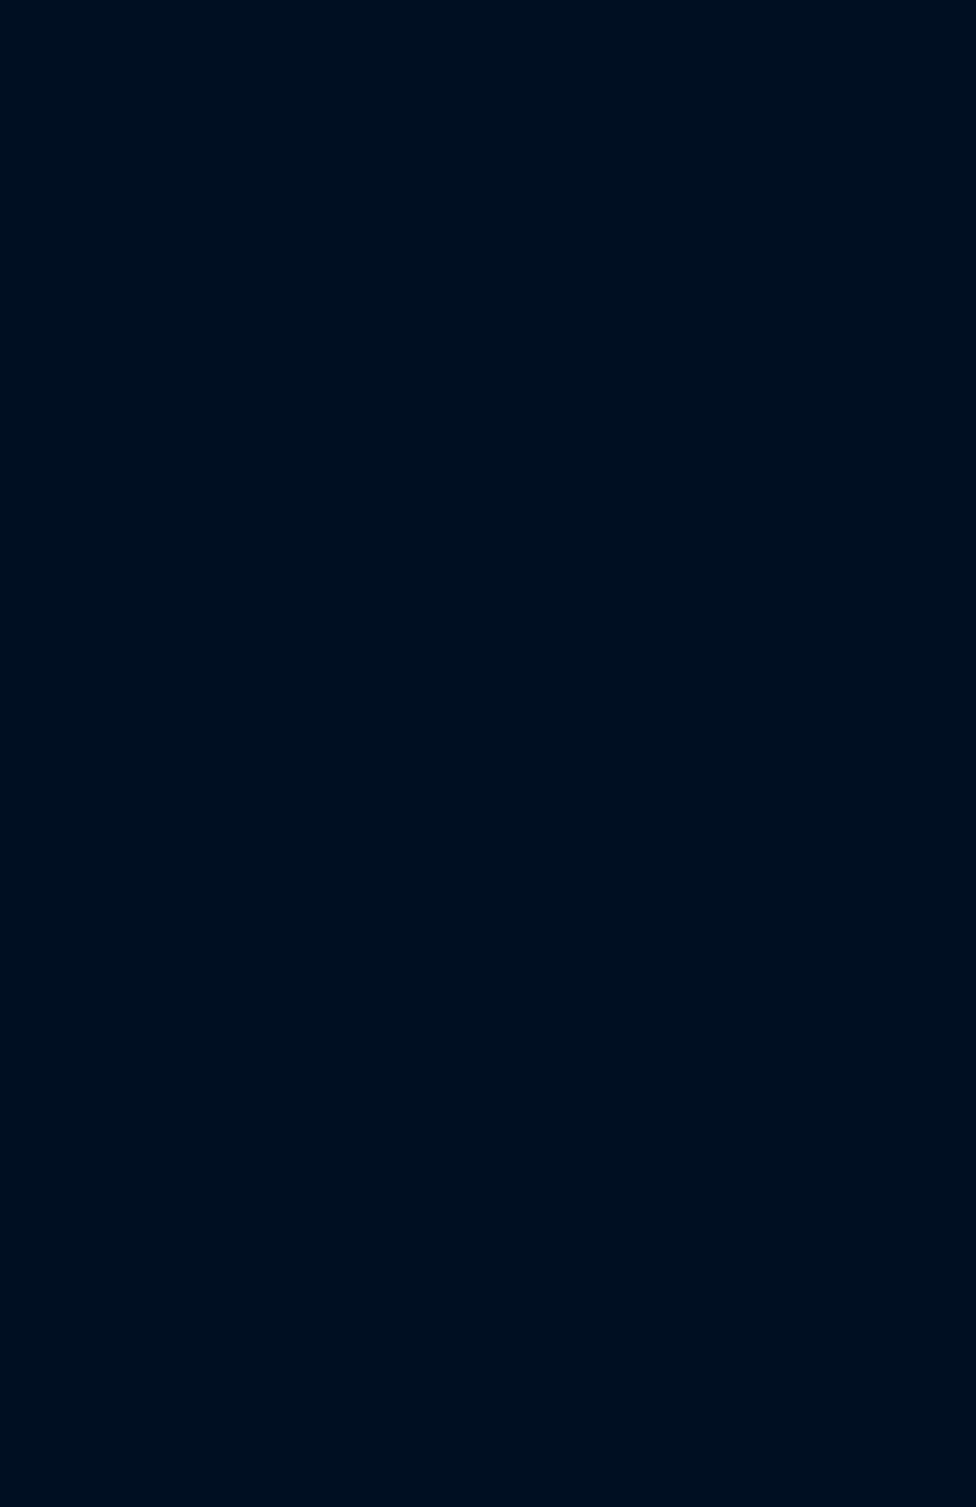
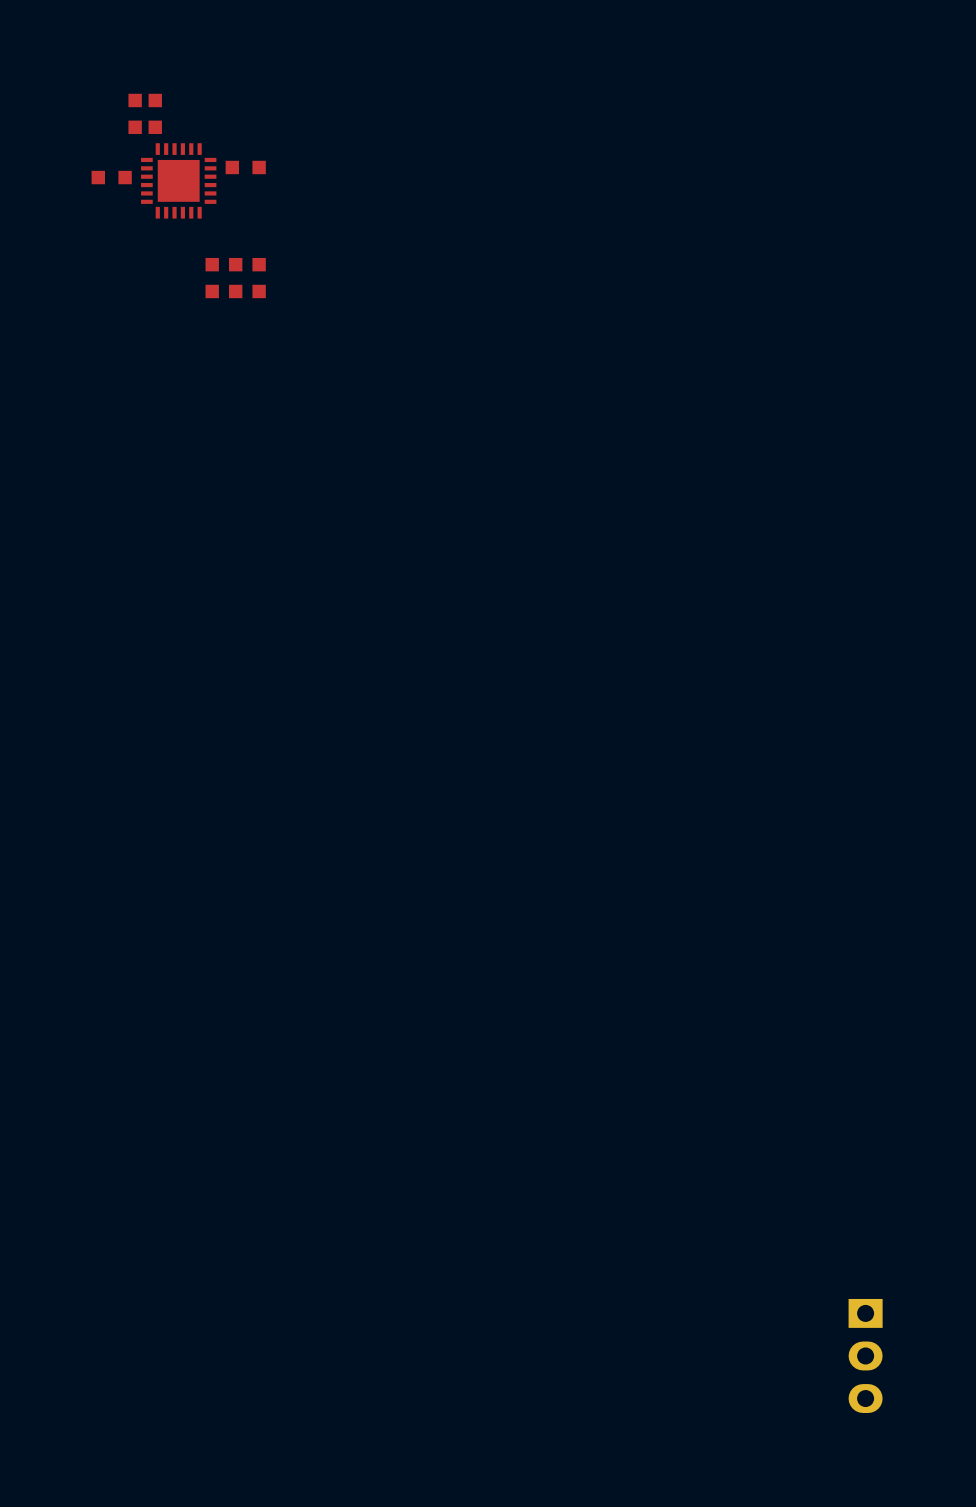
part: none -> (135, 113)
part: none -> (155, 113)
part: none -> (245, 167)
part: none -> (111, 177)
part: none -> (178, 180)
part: none -> (212, 278)
part: none -> (235, 278)
part: none -> (259, 278)
part: none -> (865, 1355)

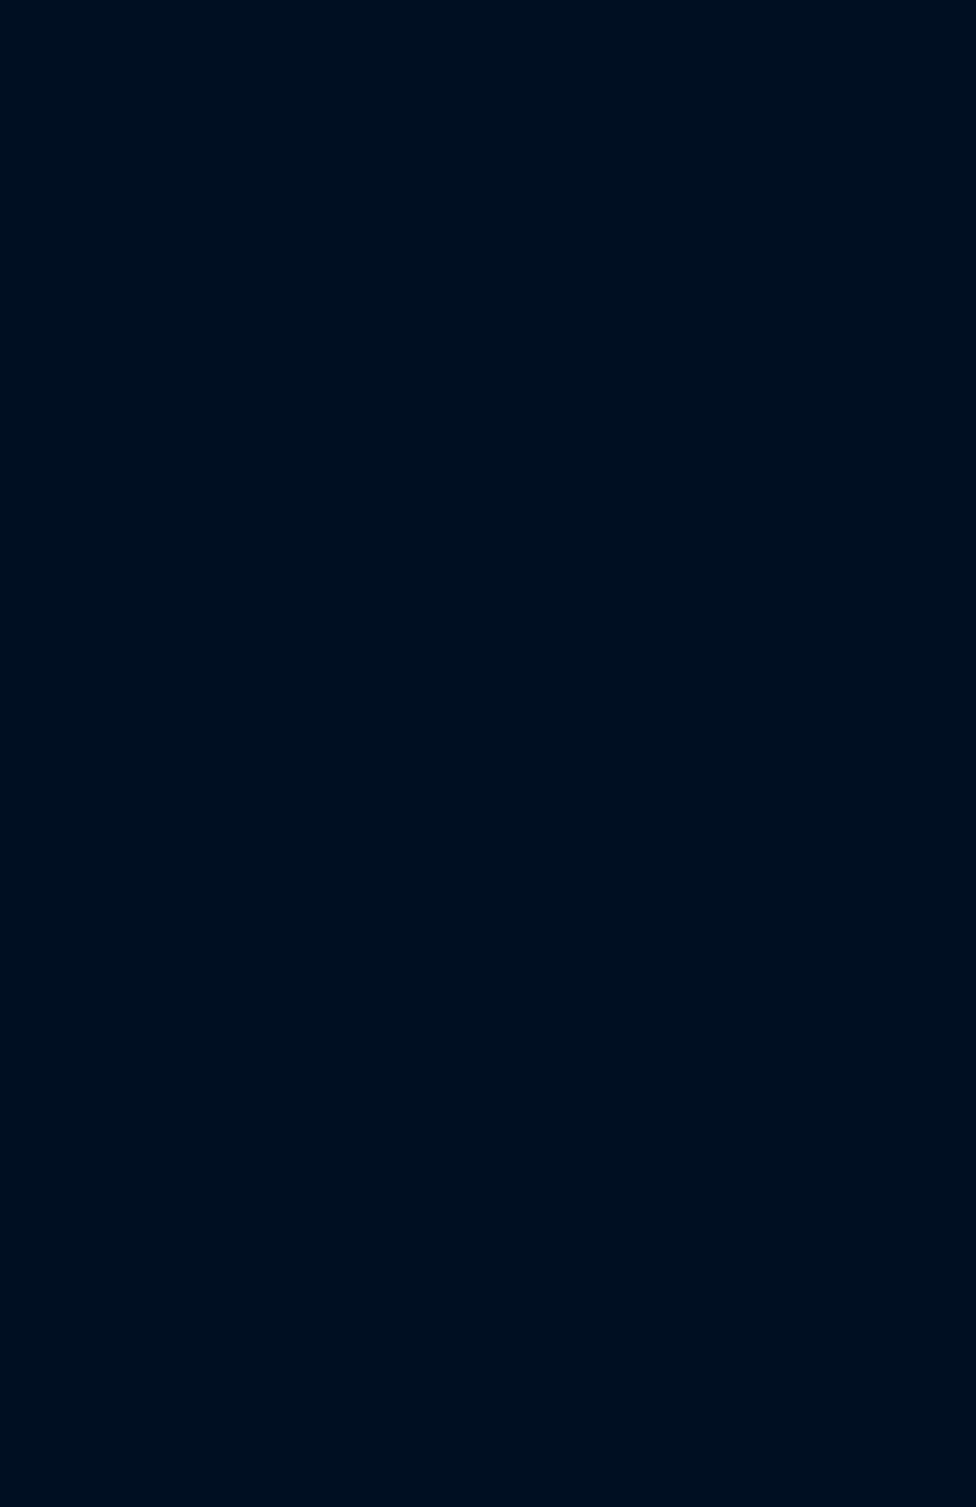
part: (135, 113) -> none
part: (155, 113) -> none
part: (245, 167) -> none
part: (111, 177) -> none
part: (178, 180) -> none
part: (212, 278) -> none
part: (235, 278) -> none
part: (259, 278) -> none
part: (865, 1355) -> none

